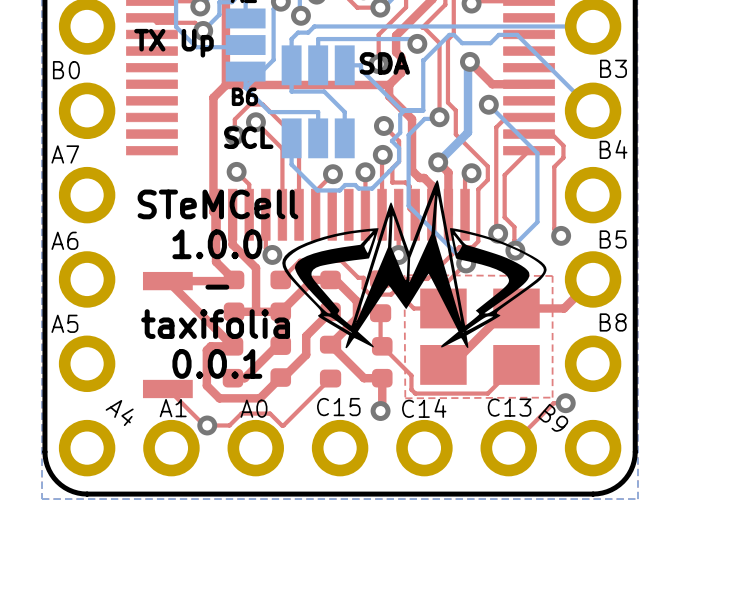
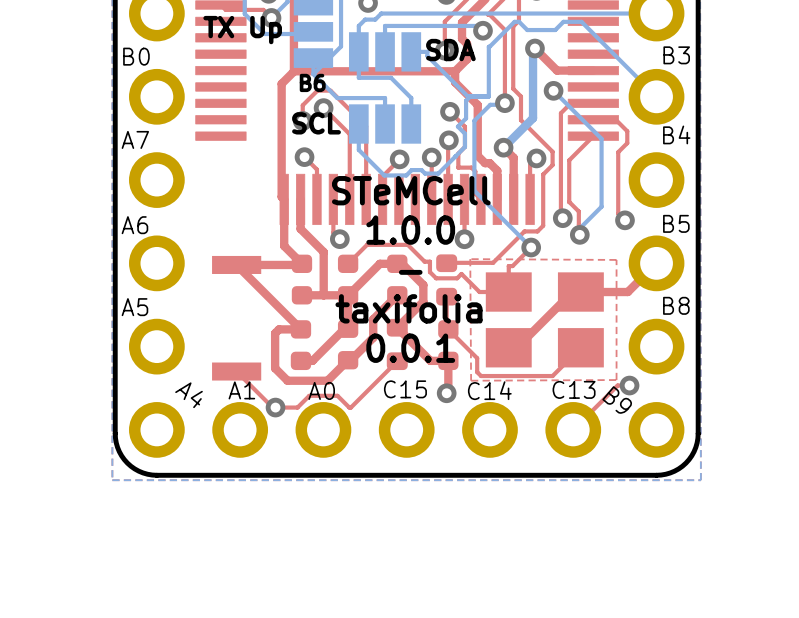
drawing: [282, 180, 547, 349] -> none
text position: STeMCell (217, 204) -> STeMCell (411, 190)
text position: 1.0.0 (217, 244) -> 1.0.0 (410, 230)
text position: - (217, 287) -> - (410, 272)
text position: taxifolia (215, 324) -> taxifolia (408, 308)
text position: 0.0.1 (217, 363) -> 0.0.1 (410, 348)

